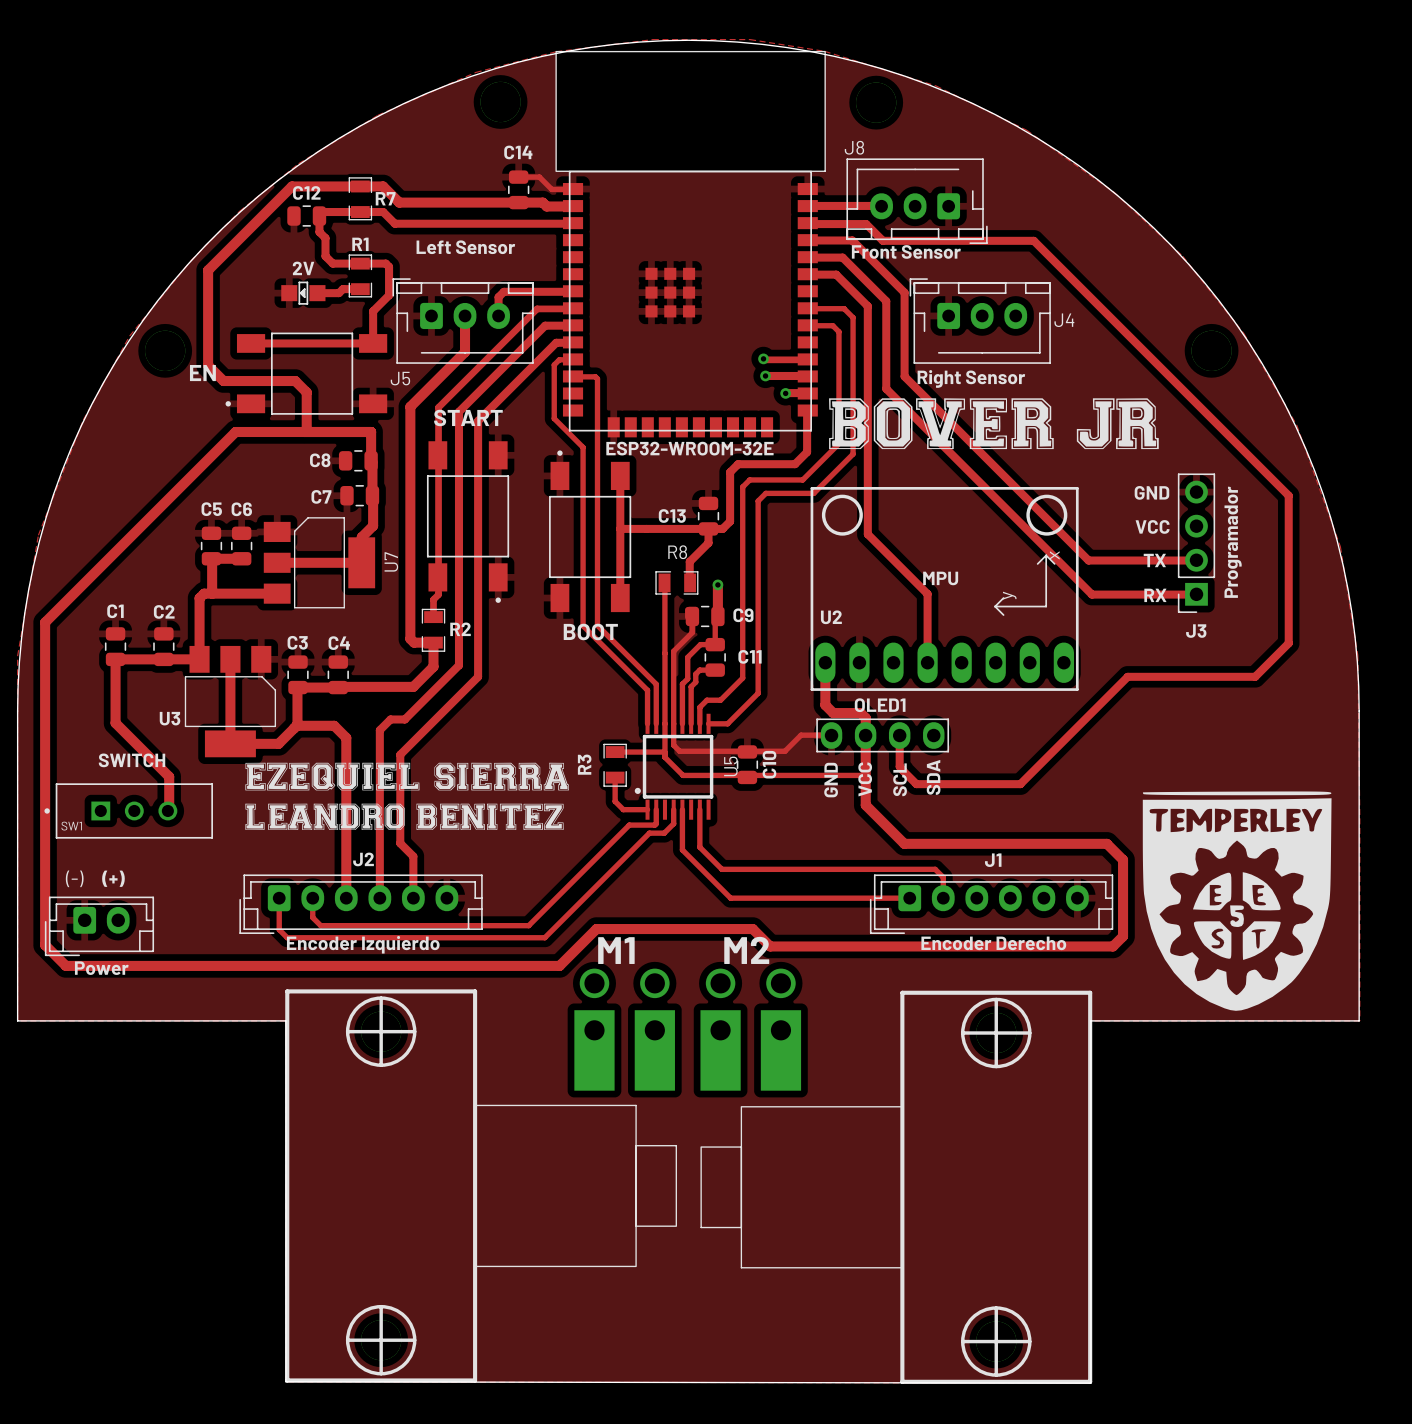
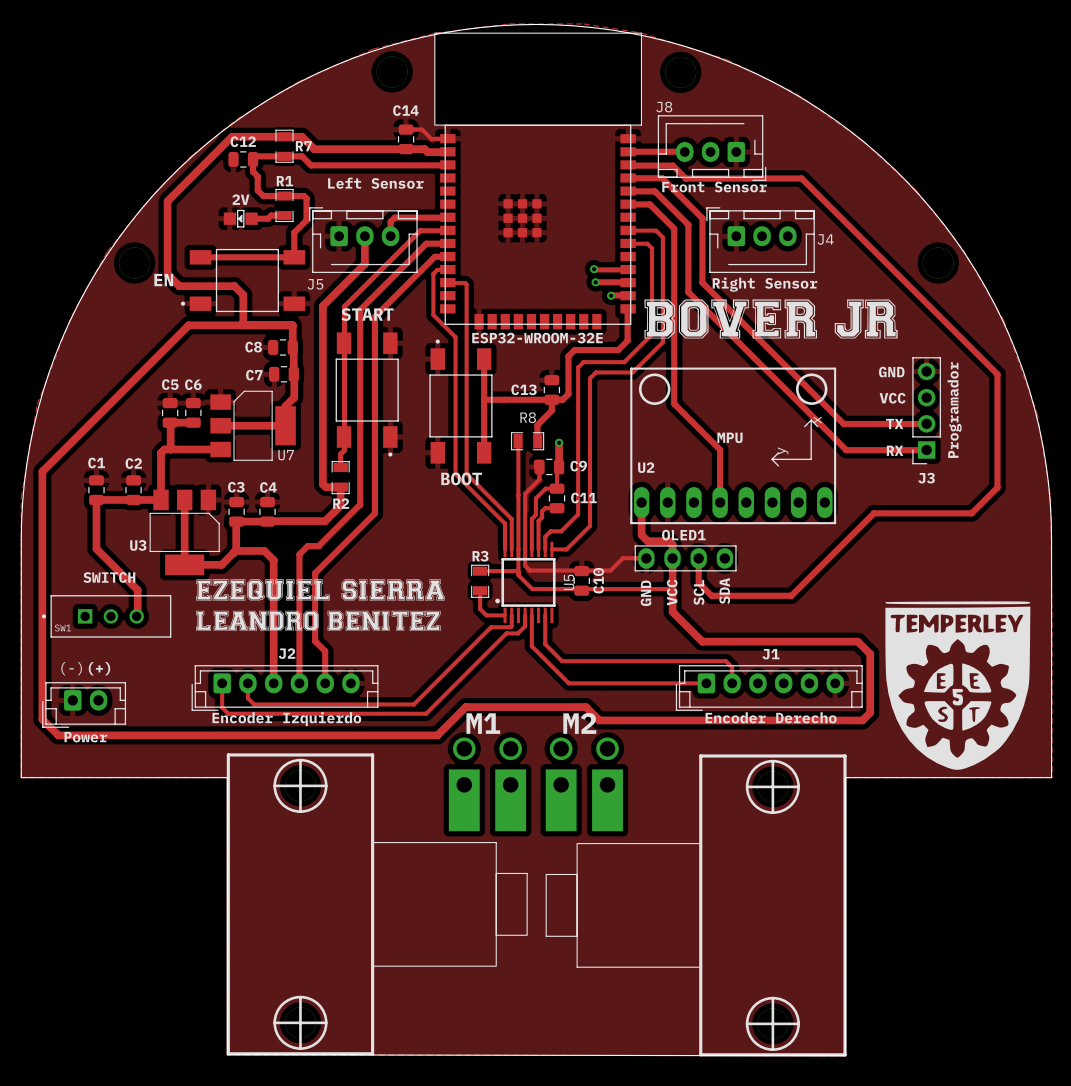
U7 name rotation: 0° (391, 561) -> 90° clockwise (286, 455)
U7 name position: U7 (391, 561) -> U7 (286, 455)
R2 name position: R2 (460, 629) -> R2 (341, 503)
R3 name rotation: 0° (584, 764) -> 90° clockwise (480, 556)
R3 name position: R3 (584, 764) -> R3 (480, 556)

